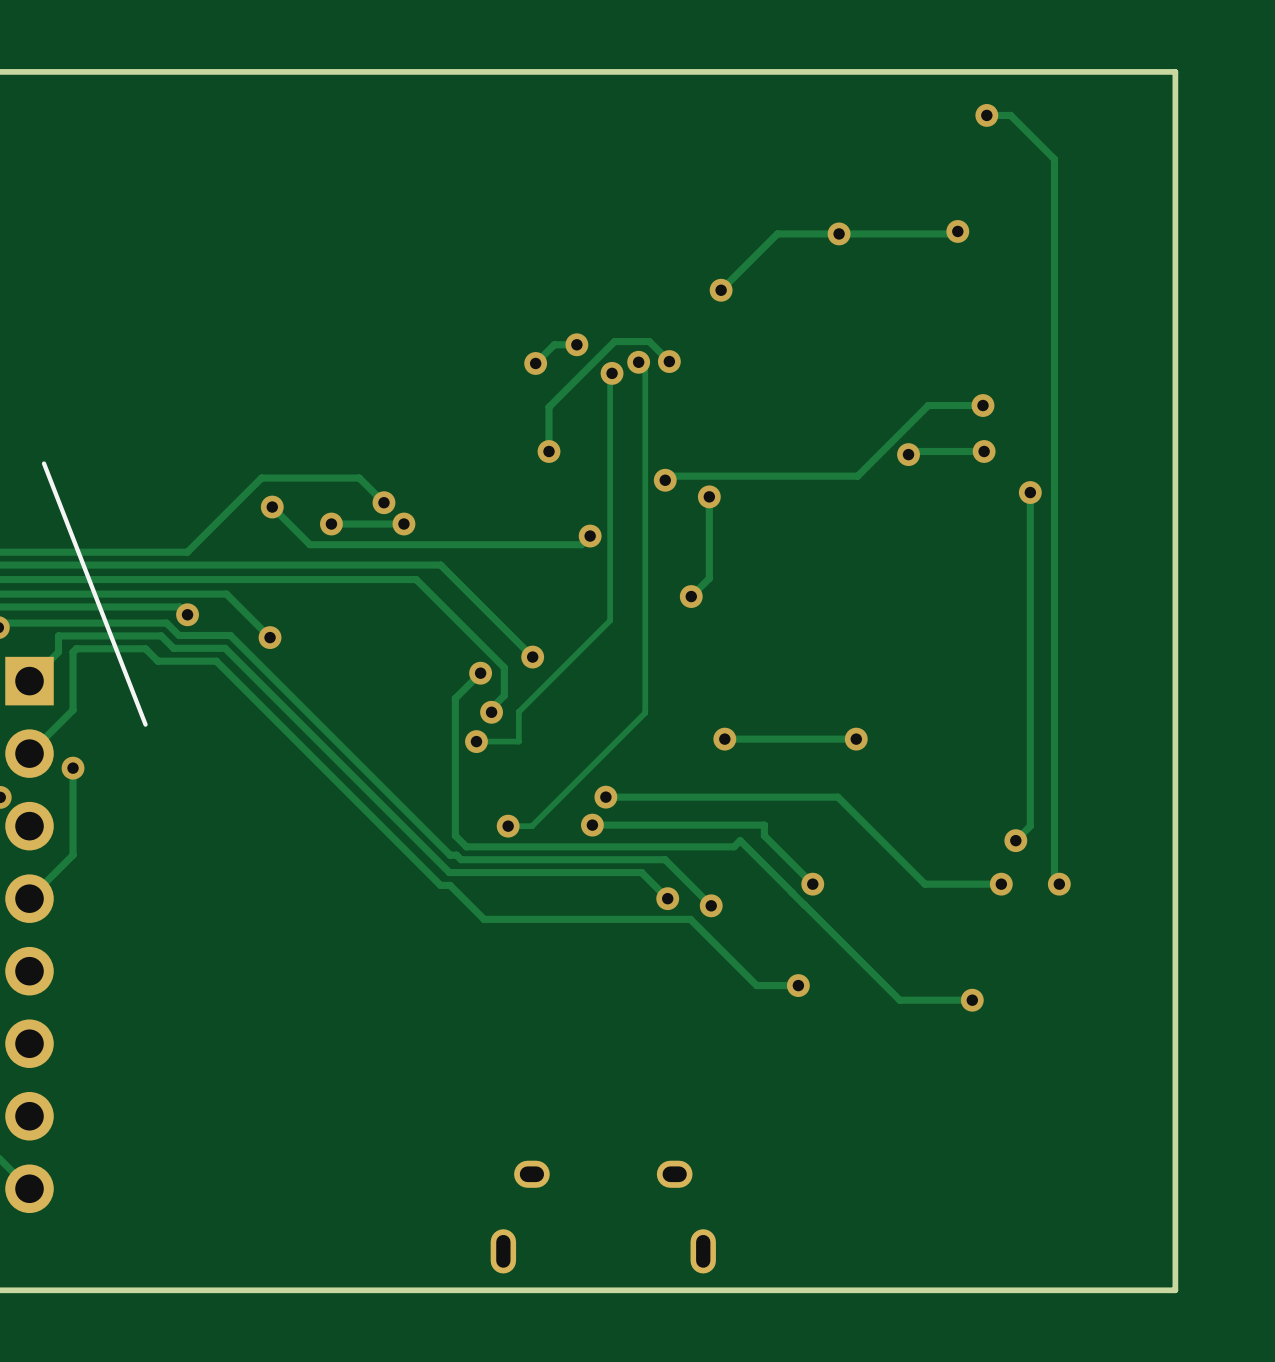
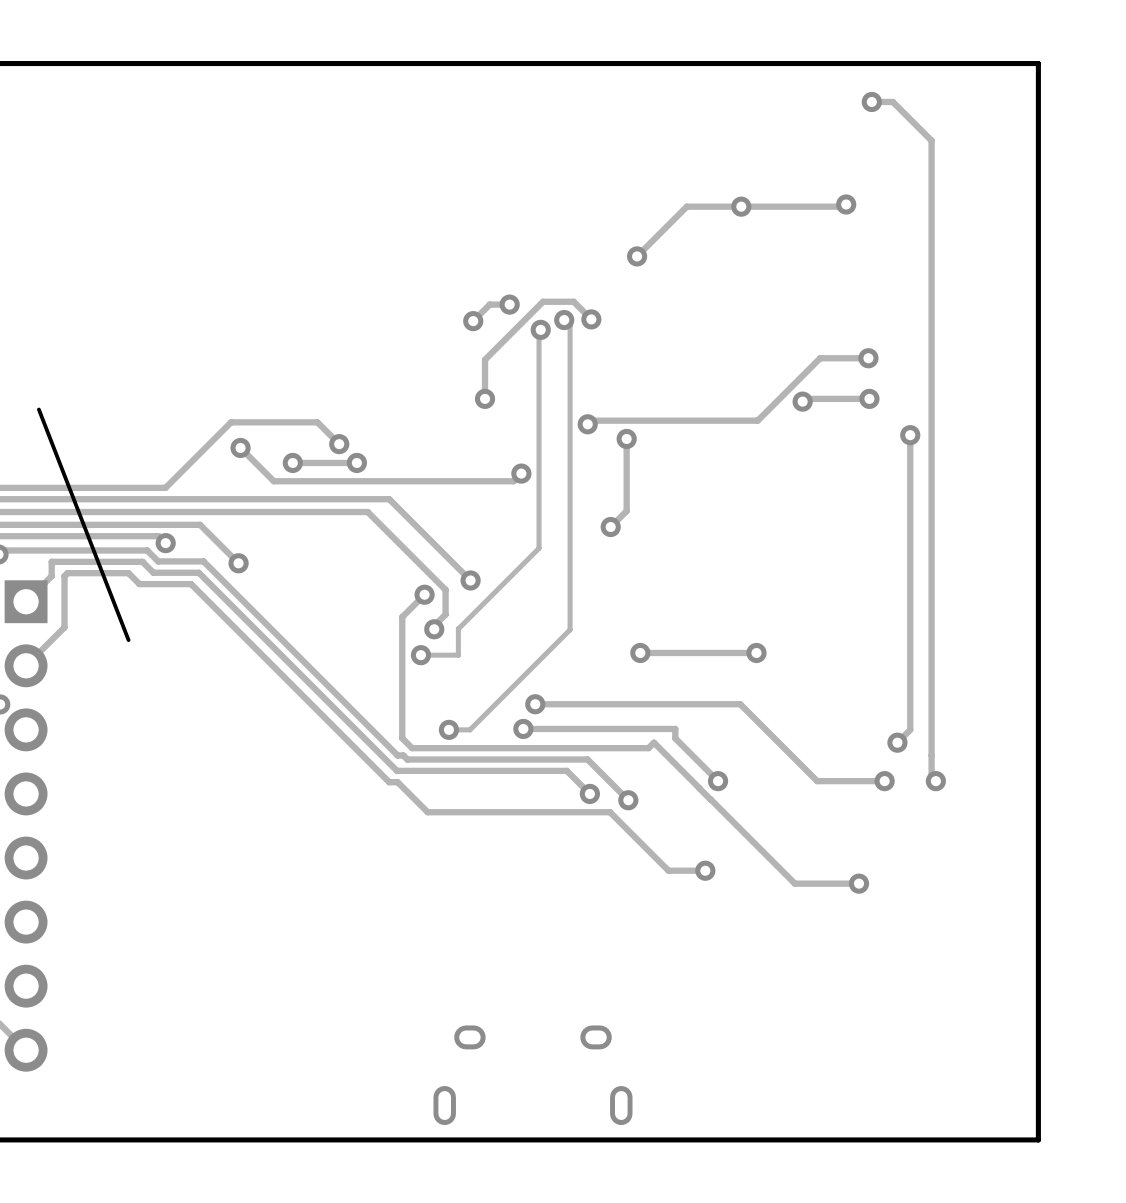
track: (73, 768) (73, 855) (29, 898) -> none
via: (73, 768) -> none

